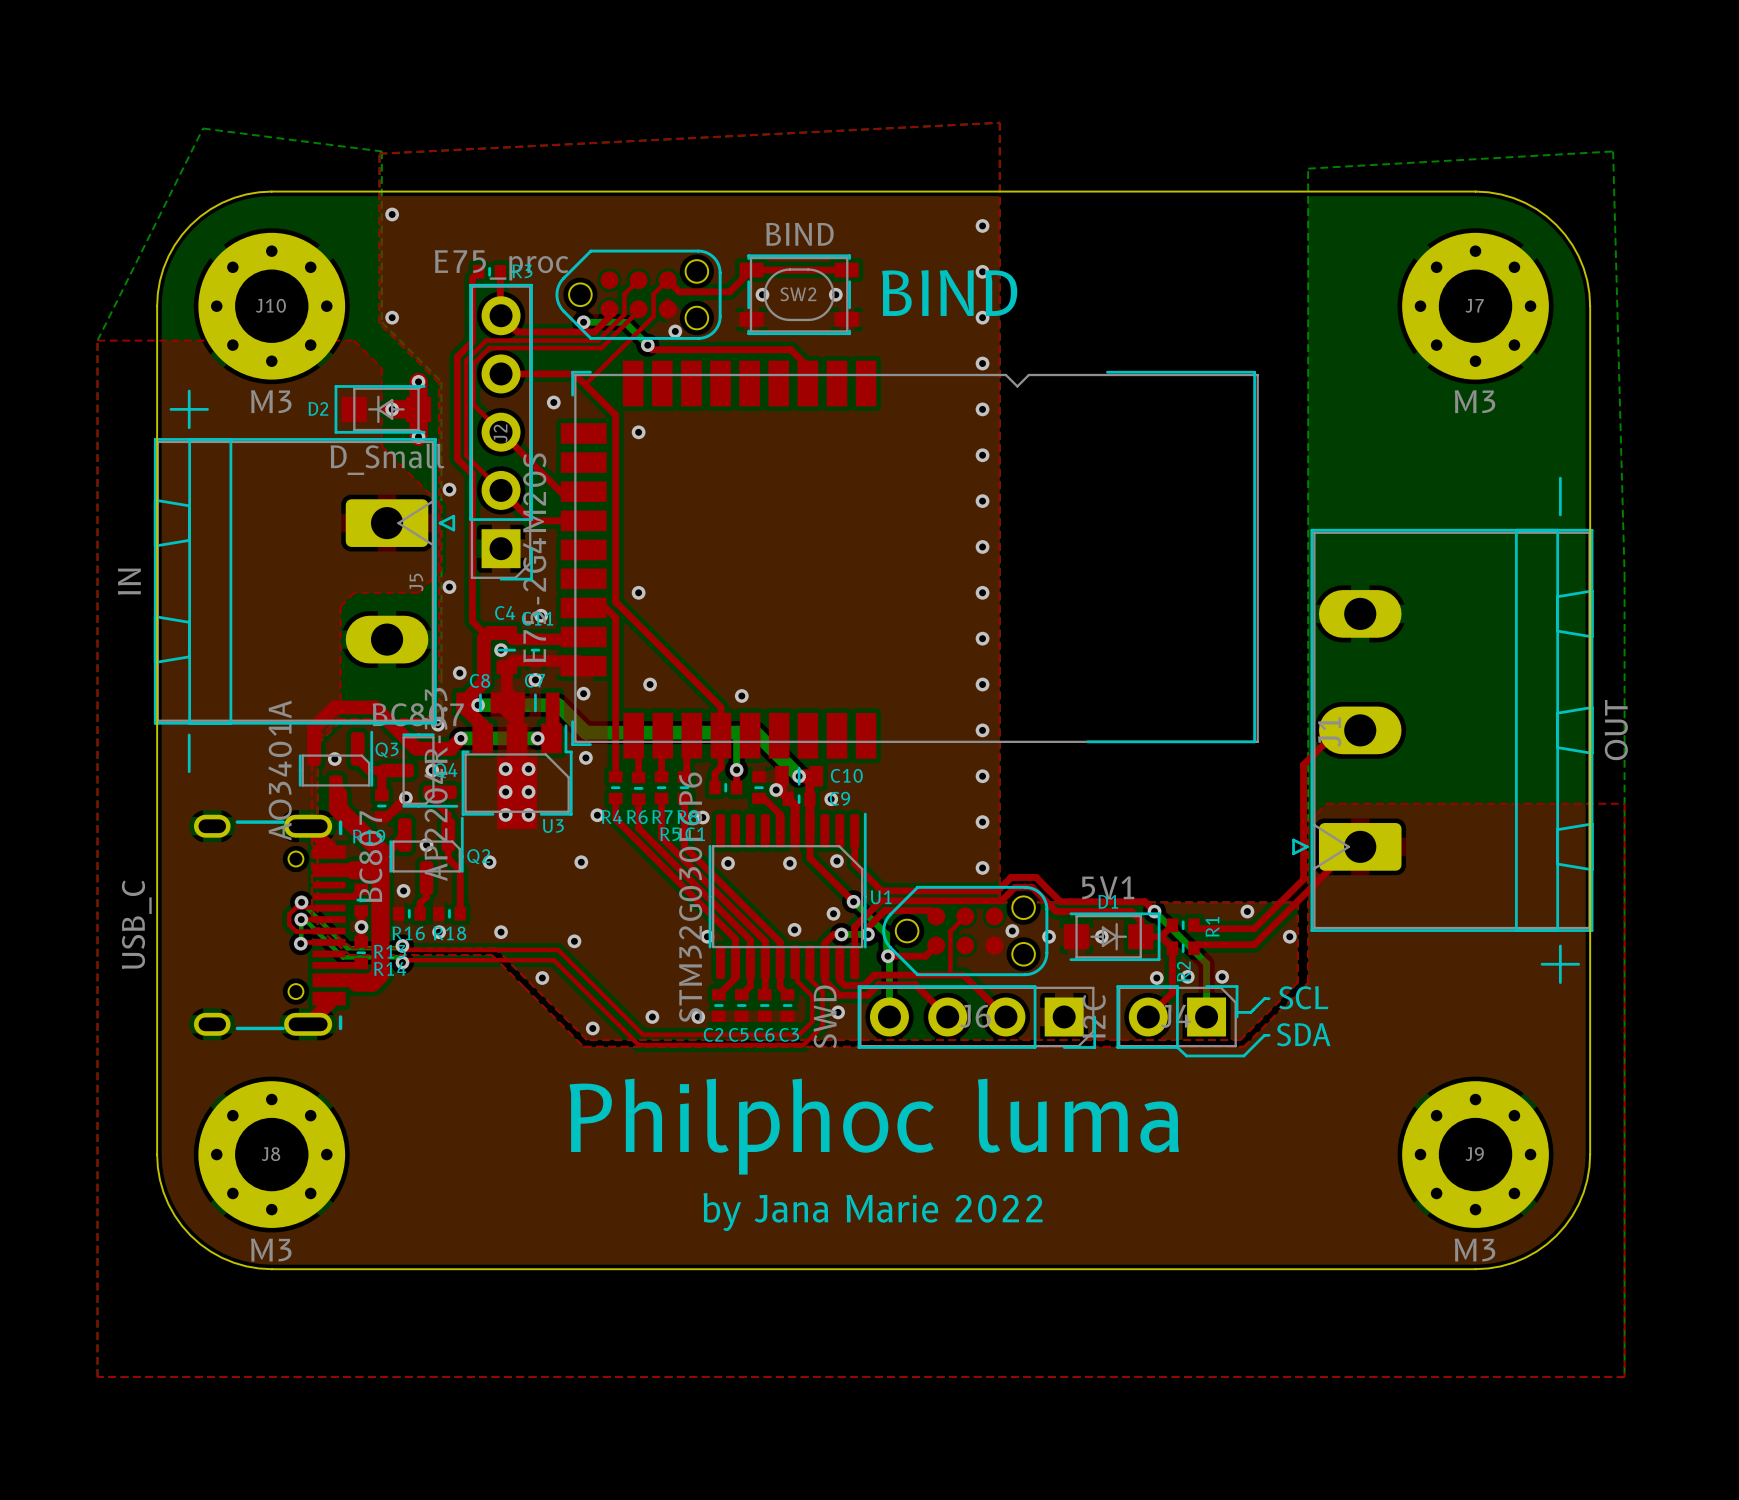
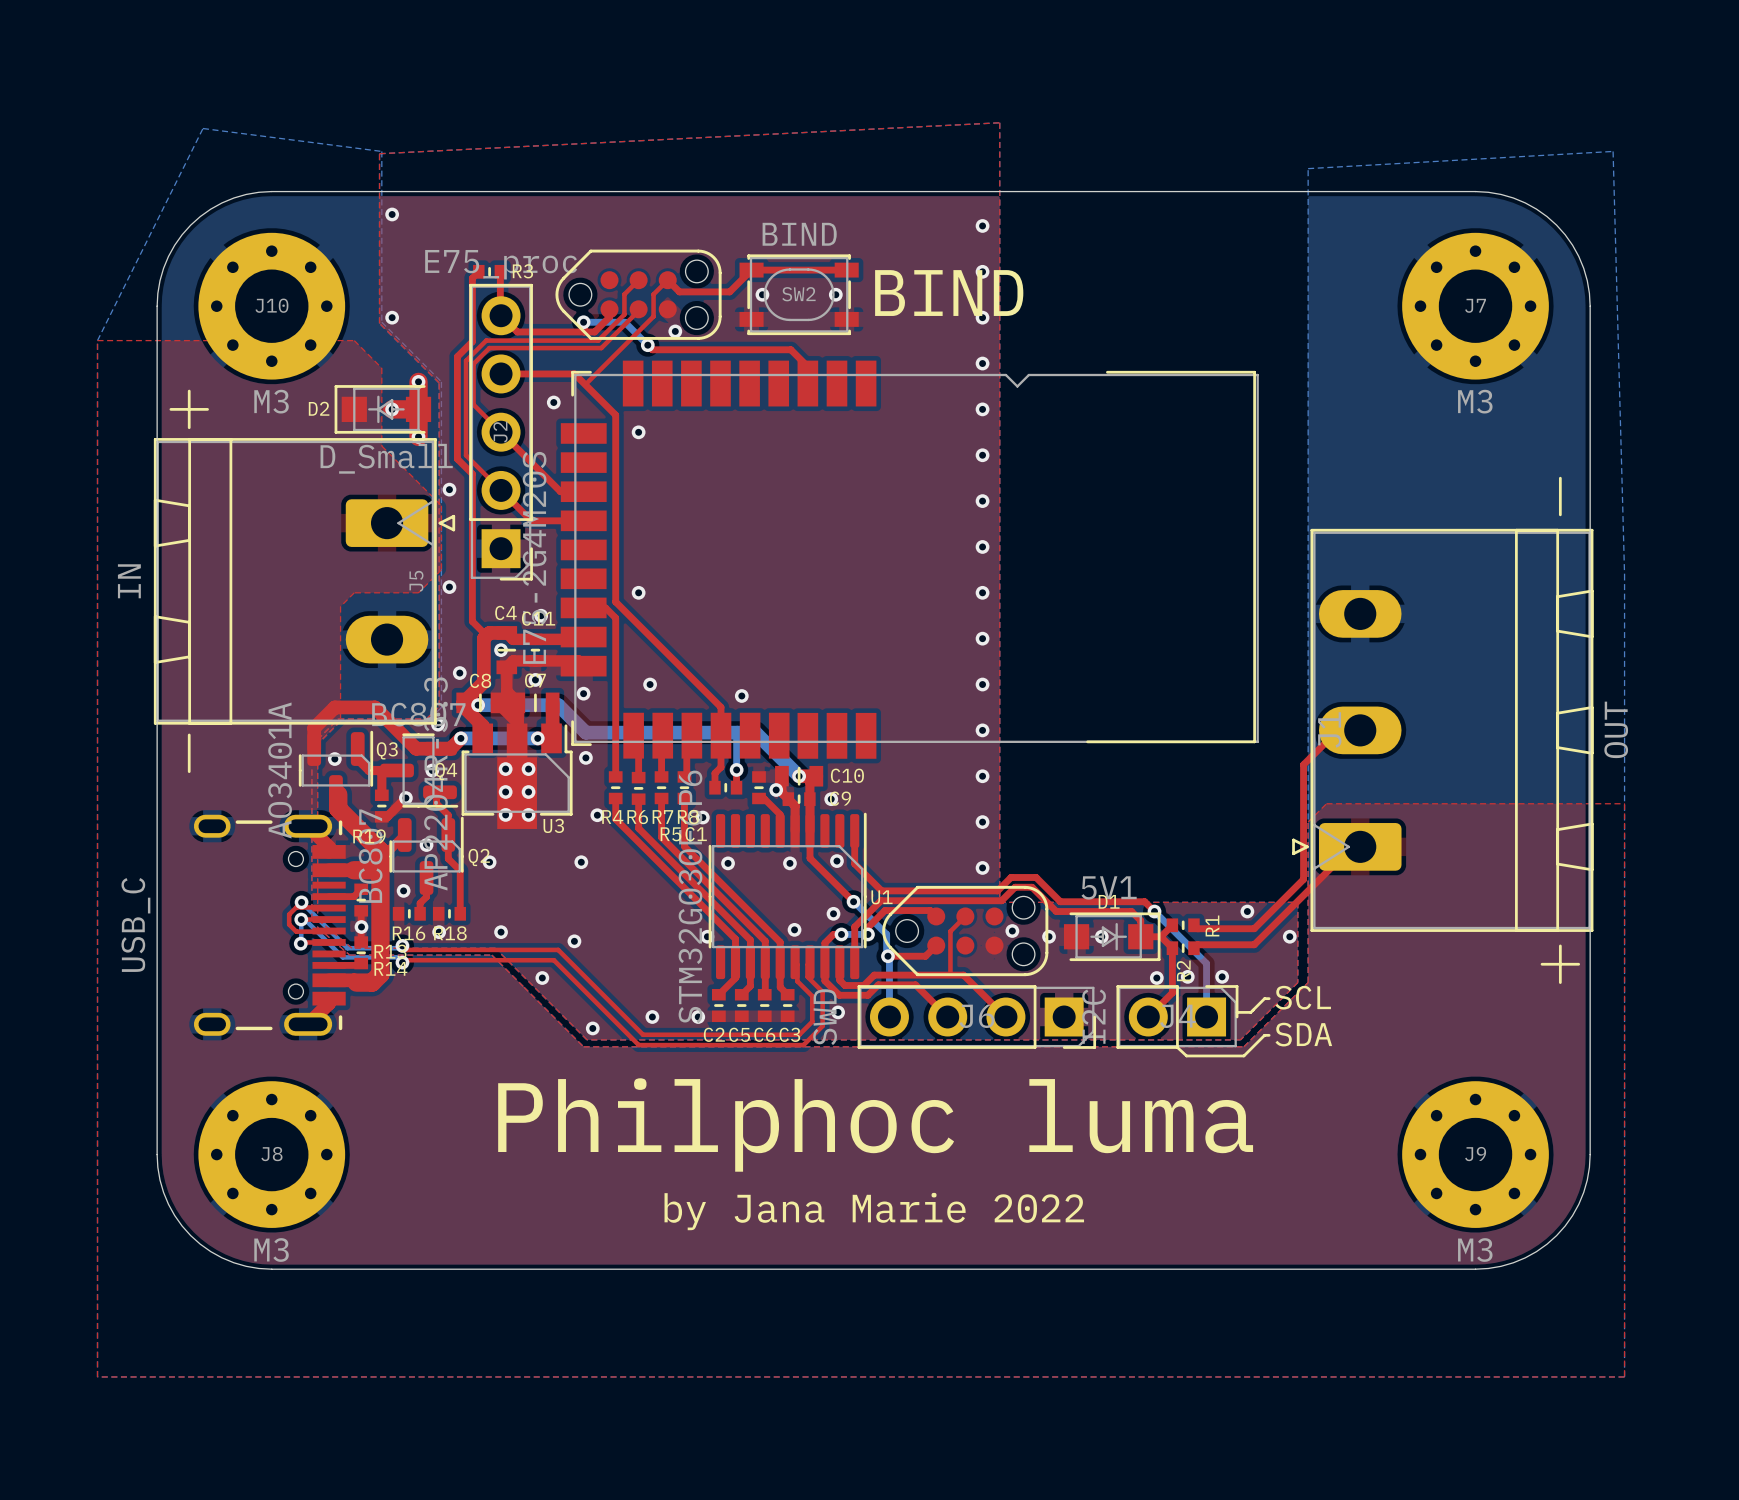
part footprint: [193, 814, 346, 1036] -> [193, 814, 346, 1036]

